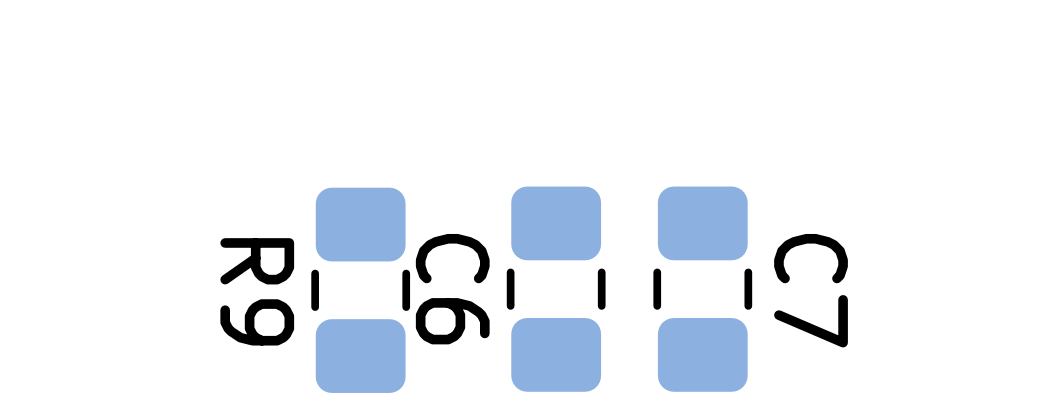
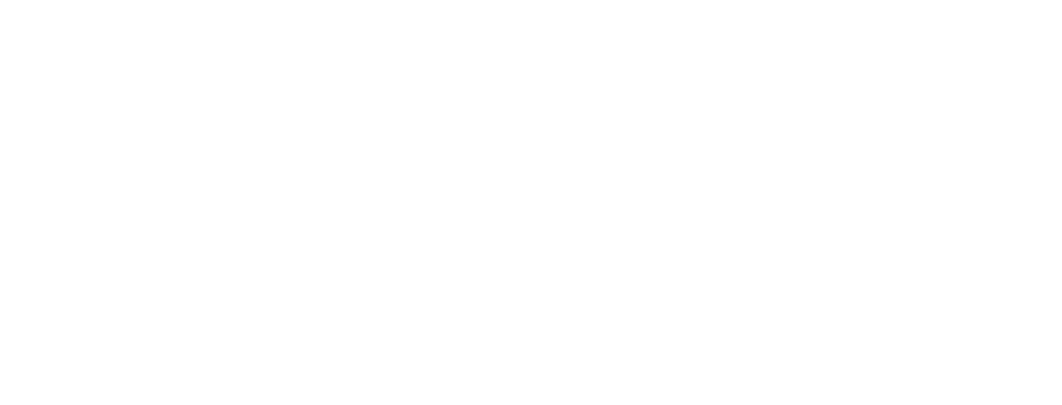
C6: (556, 289) -> none
C7: (702, 289) -> none
R9: (360, 290) -> none

